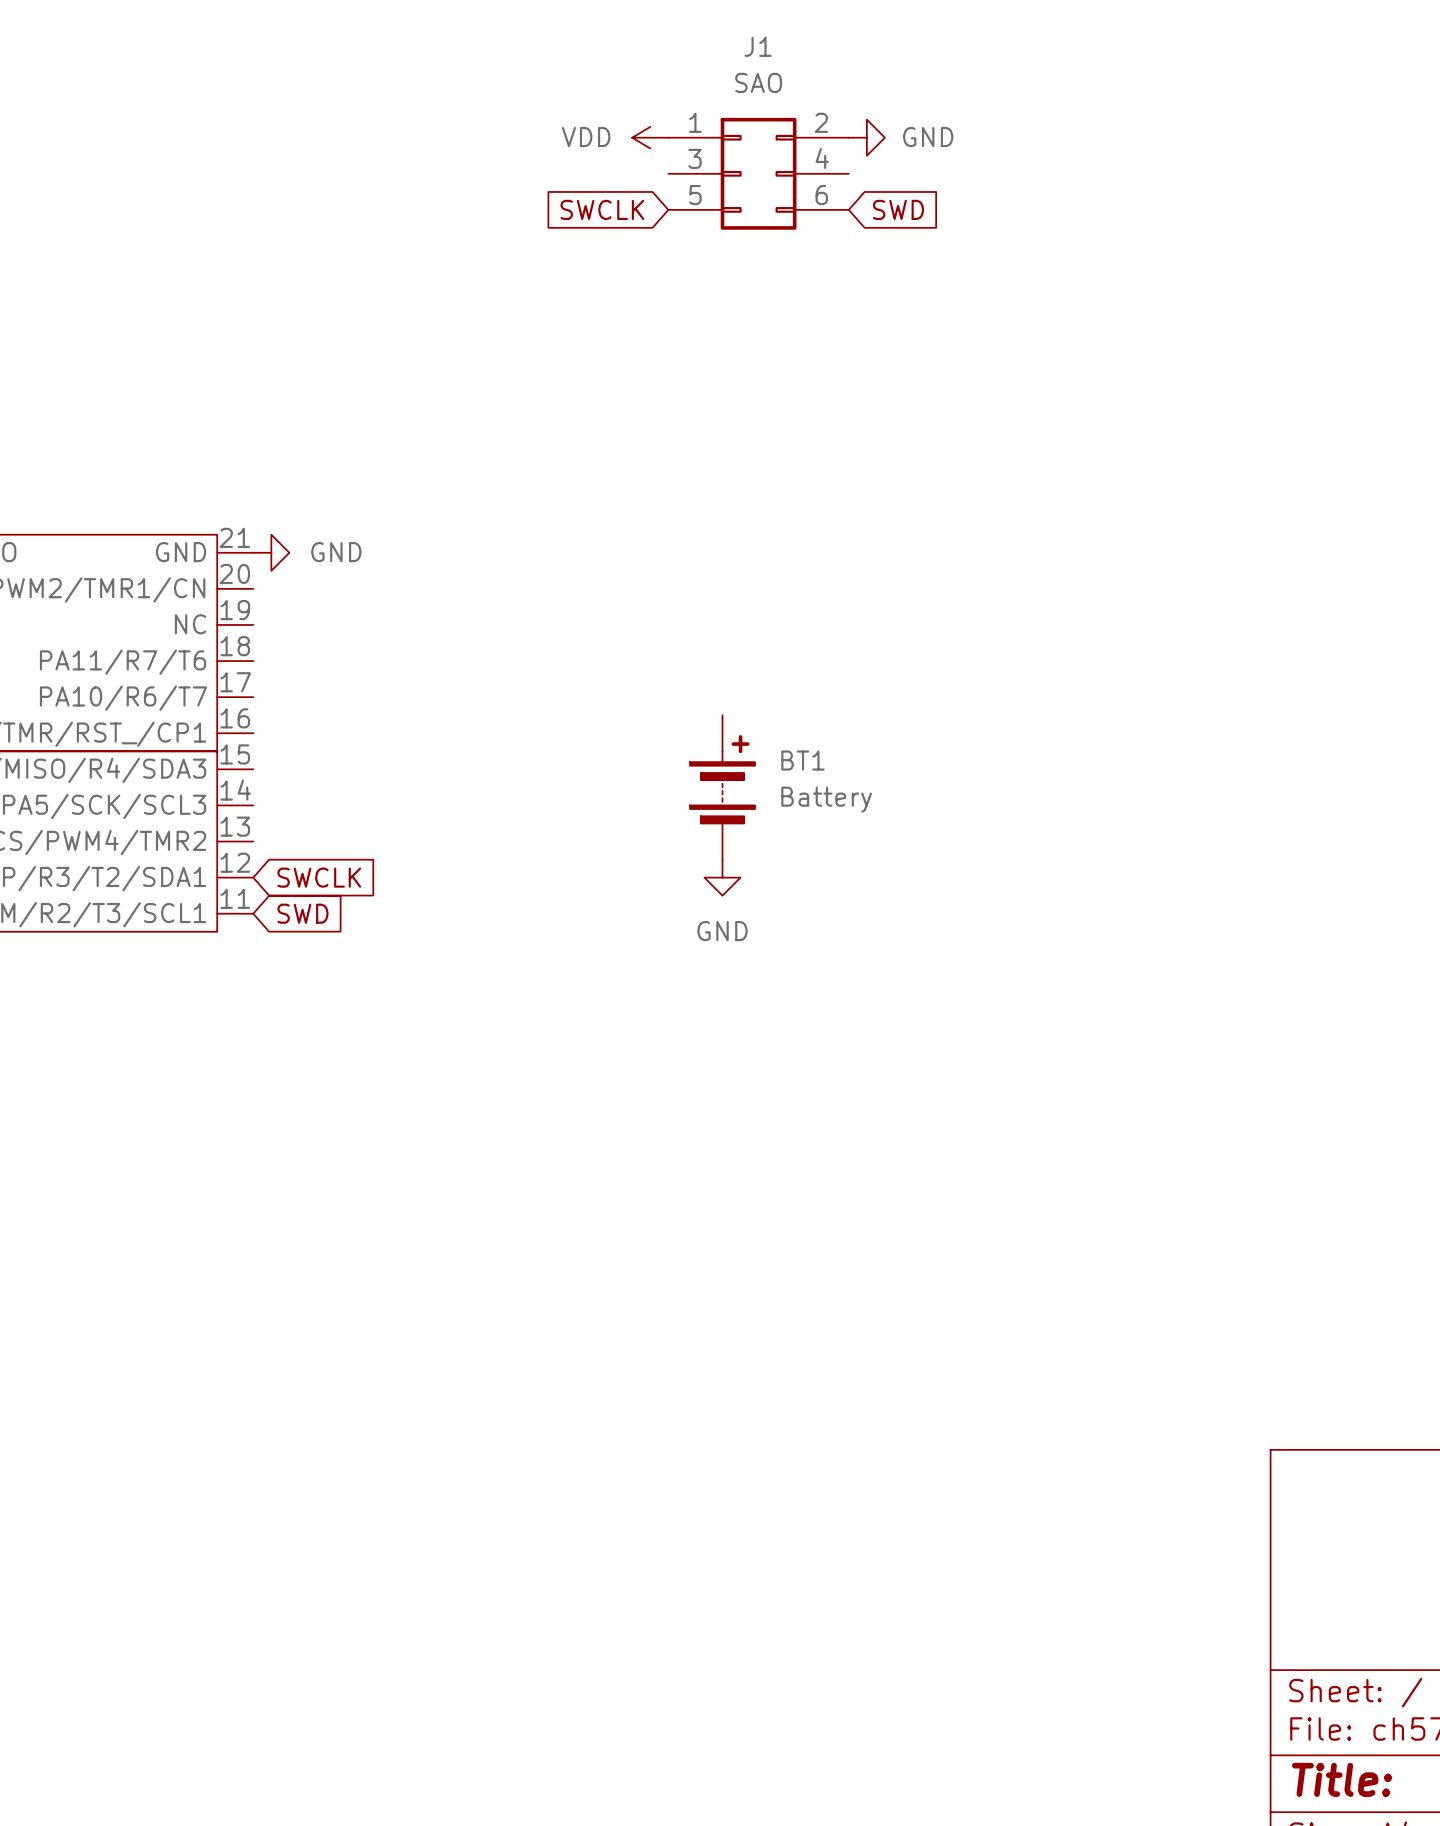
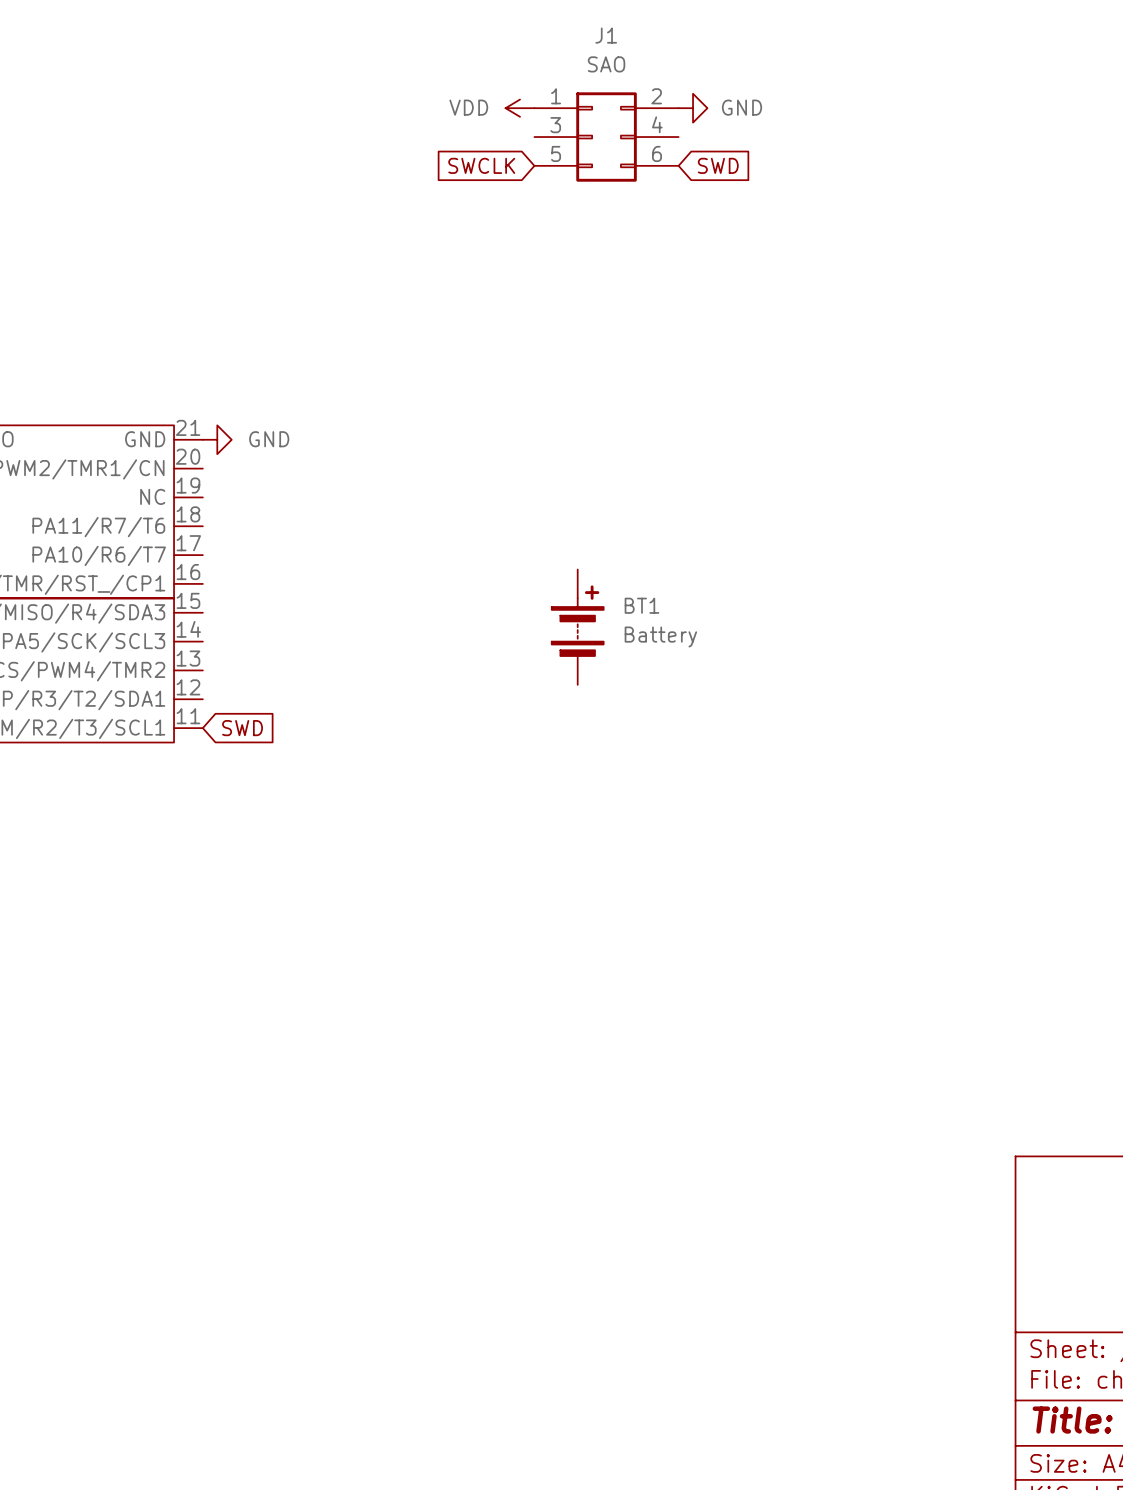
global label: SWCLK (319, 877) -> none
power symbol: GND (722, 877) -> none

